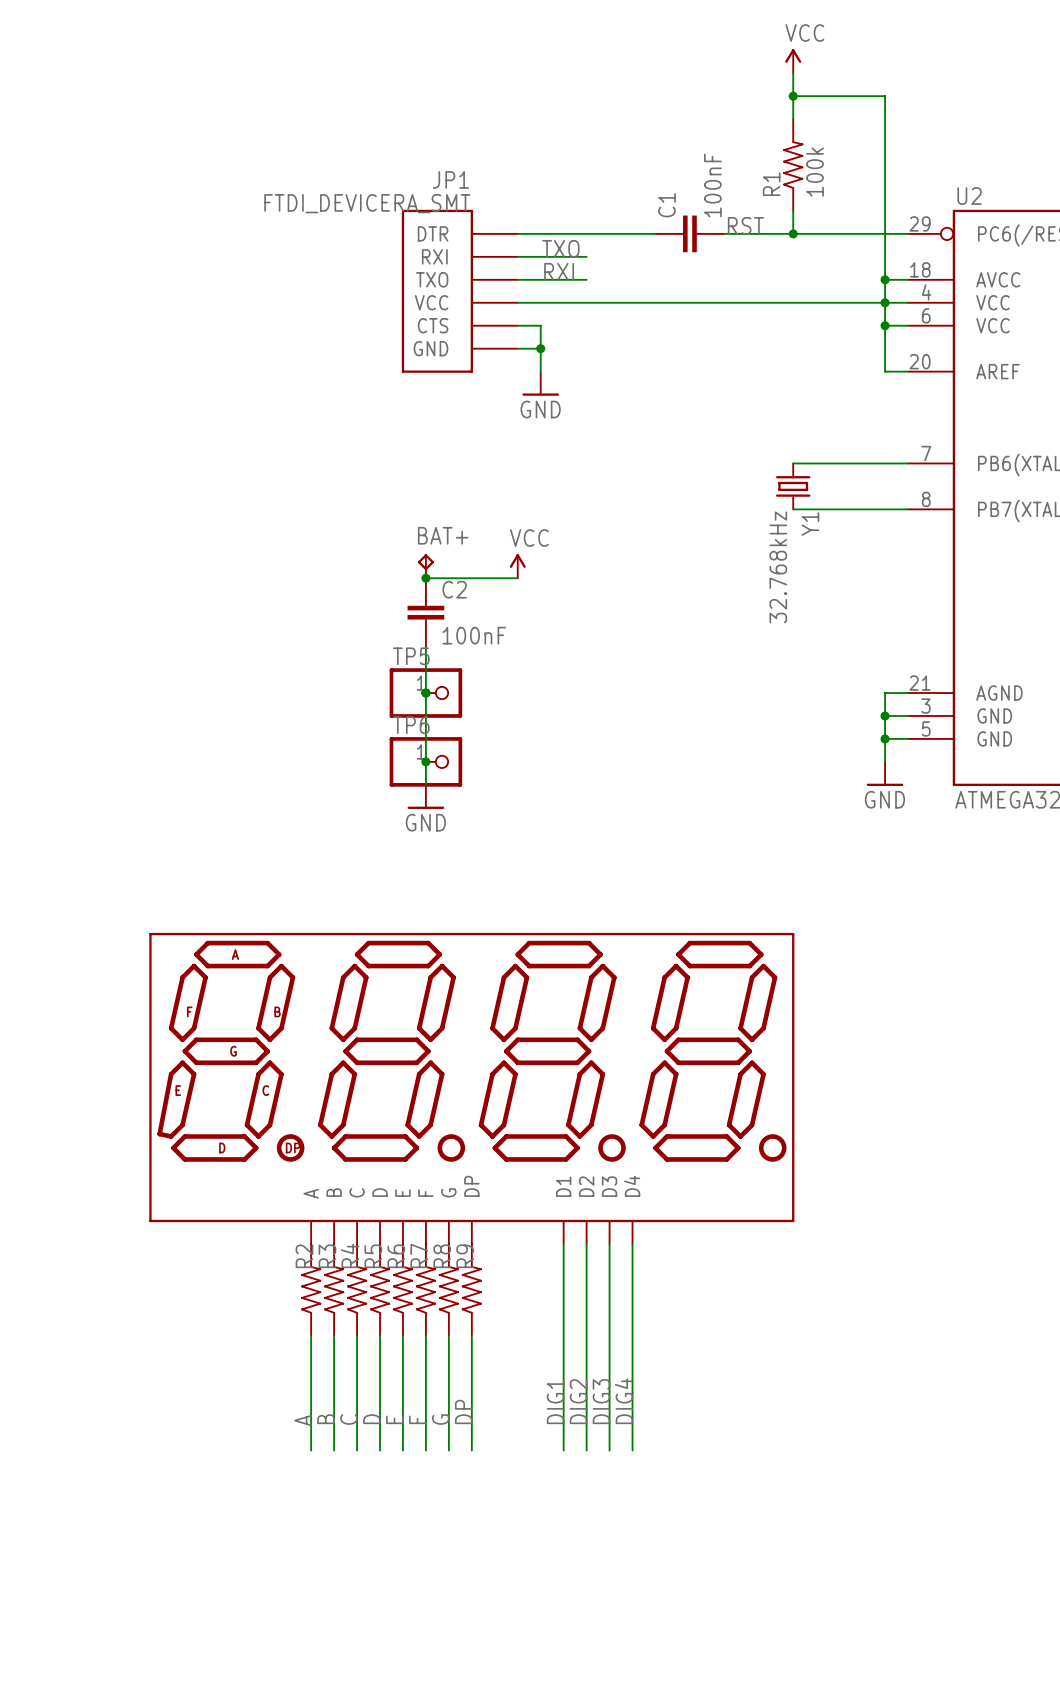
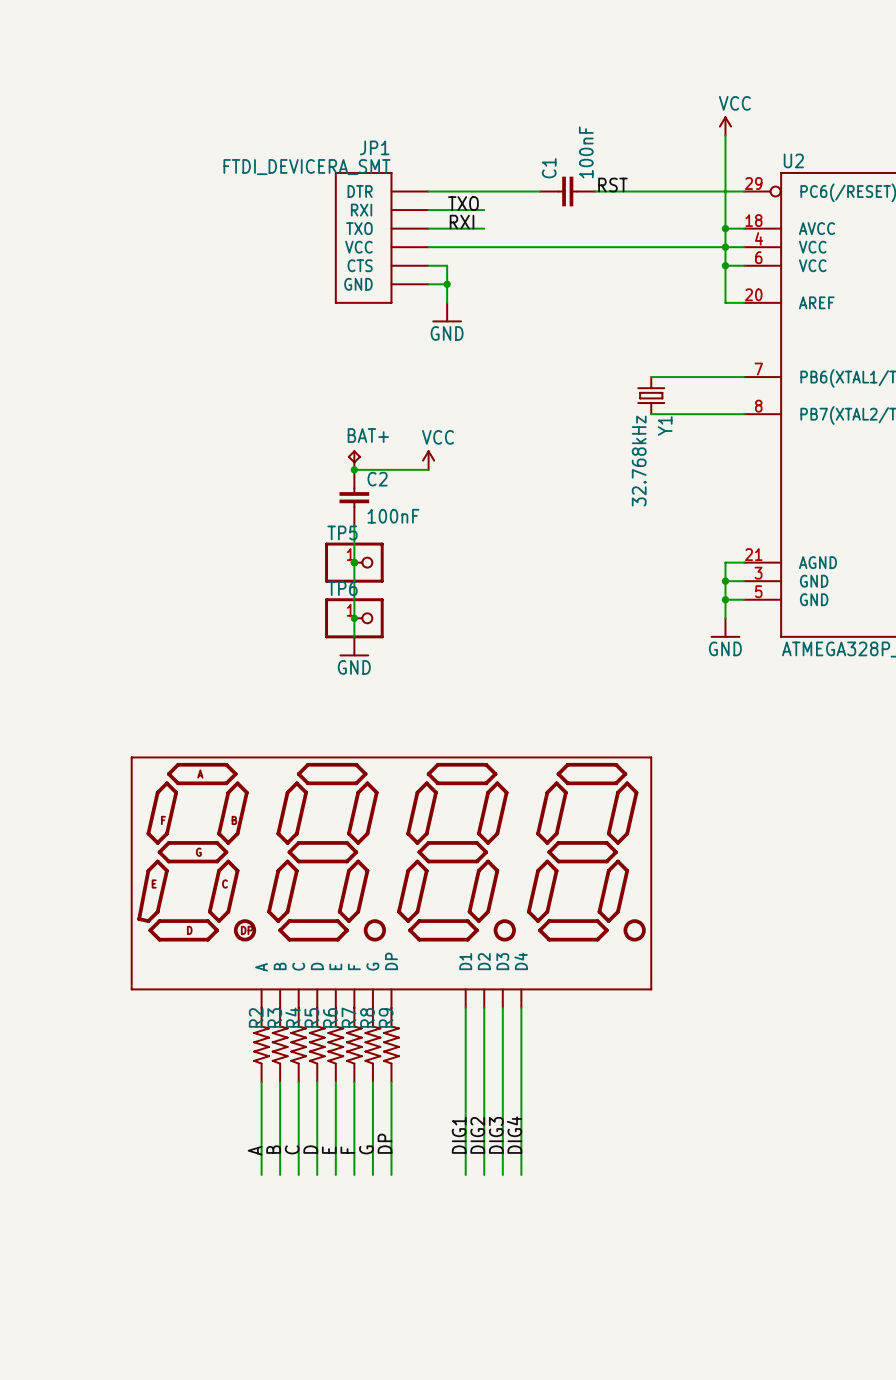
power symbol position: VCC (793, 61) -> VCC (725, 126)
wire: (793, 73) (793, 119) -> none
wire: (793, 96) (885, 96) (885, 165) -> none
junction: (793, 96) -> none
R1: 100k (793, 165) -> none
wire: (793, 210) (793, 233) -> none
junction: (793, 233) -> none

